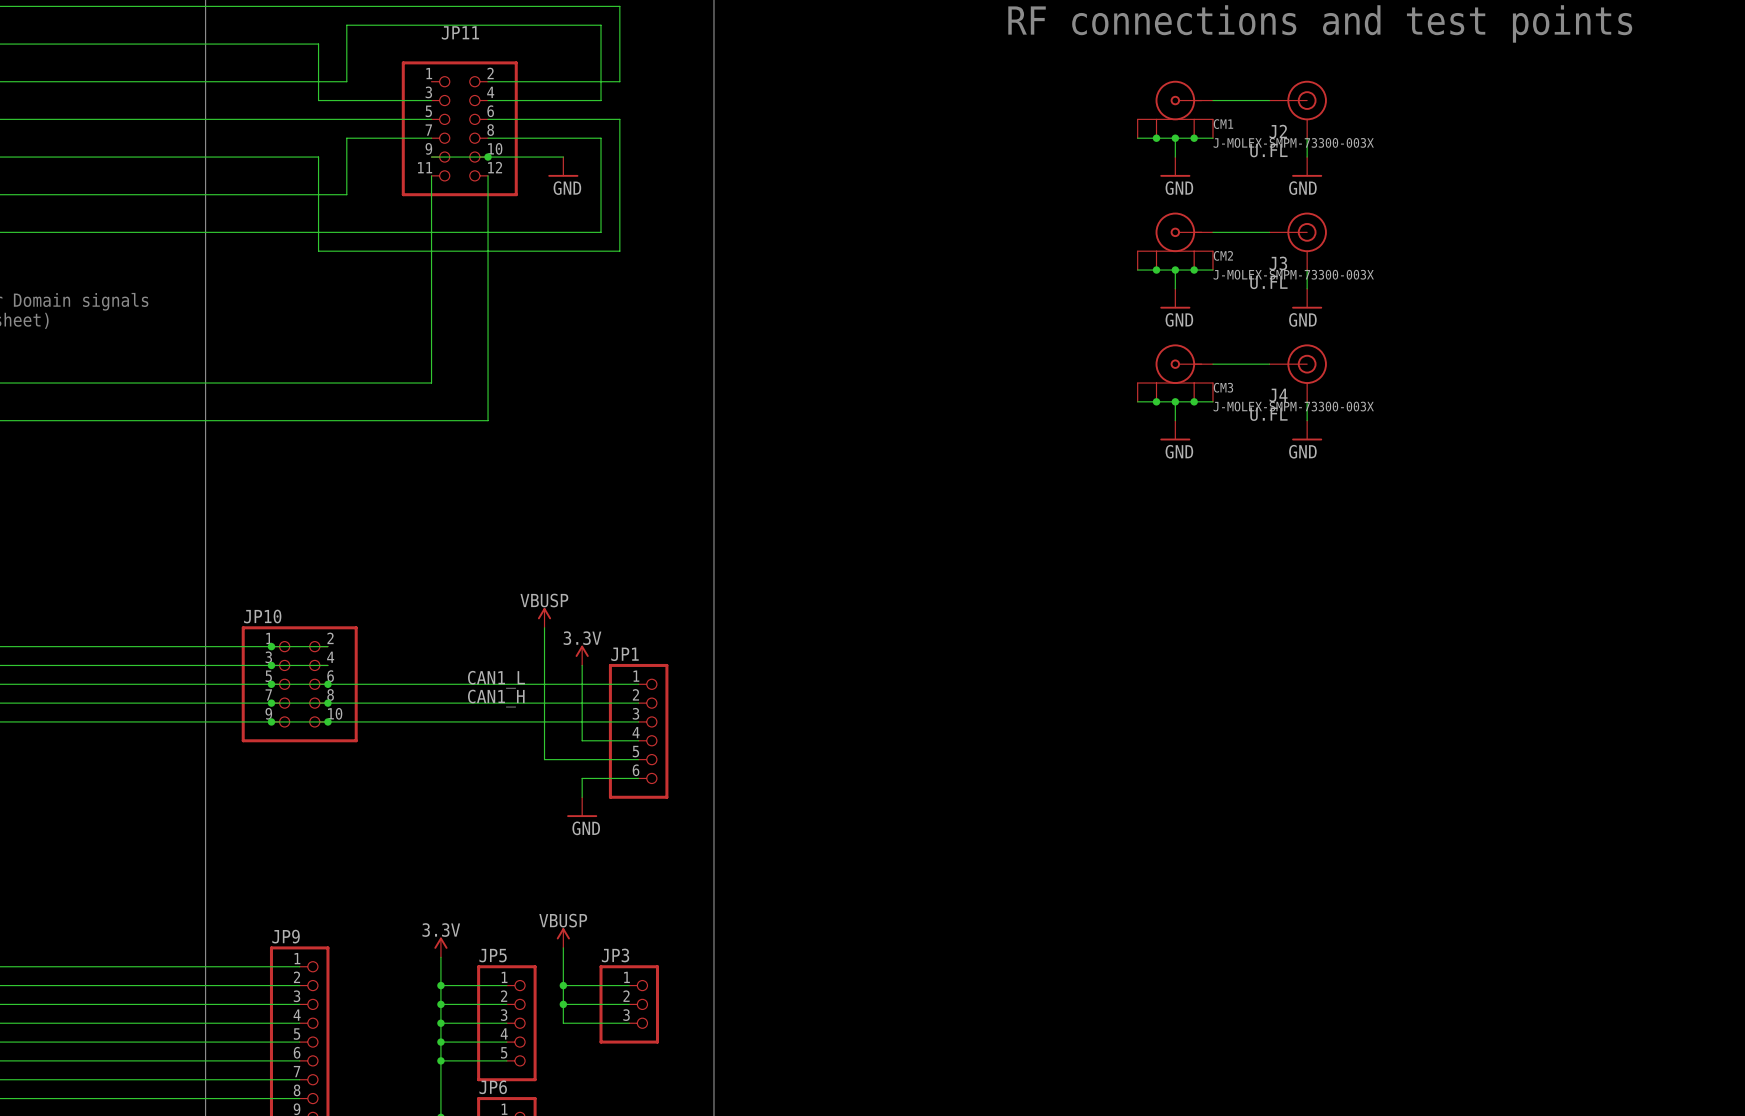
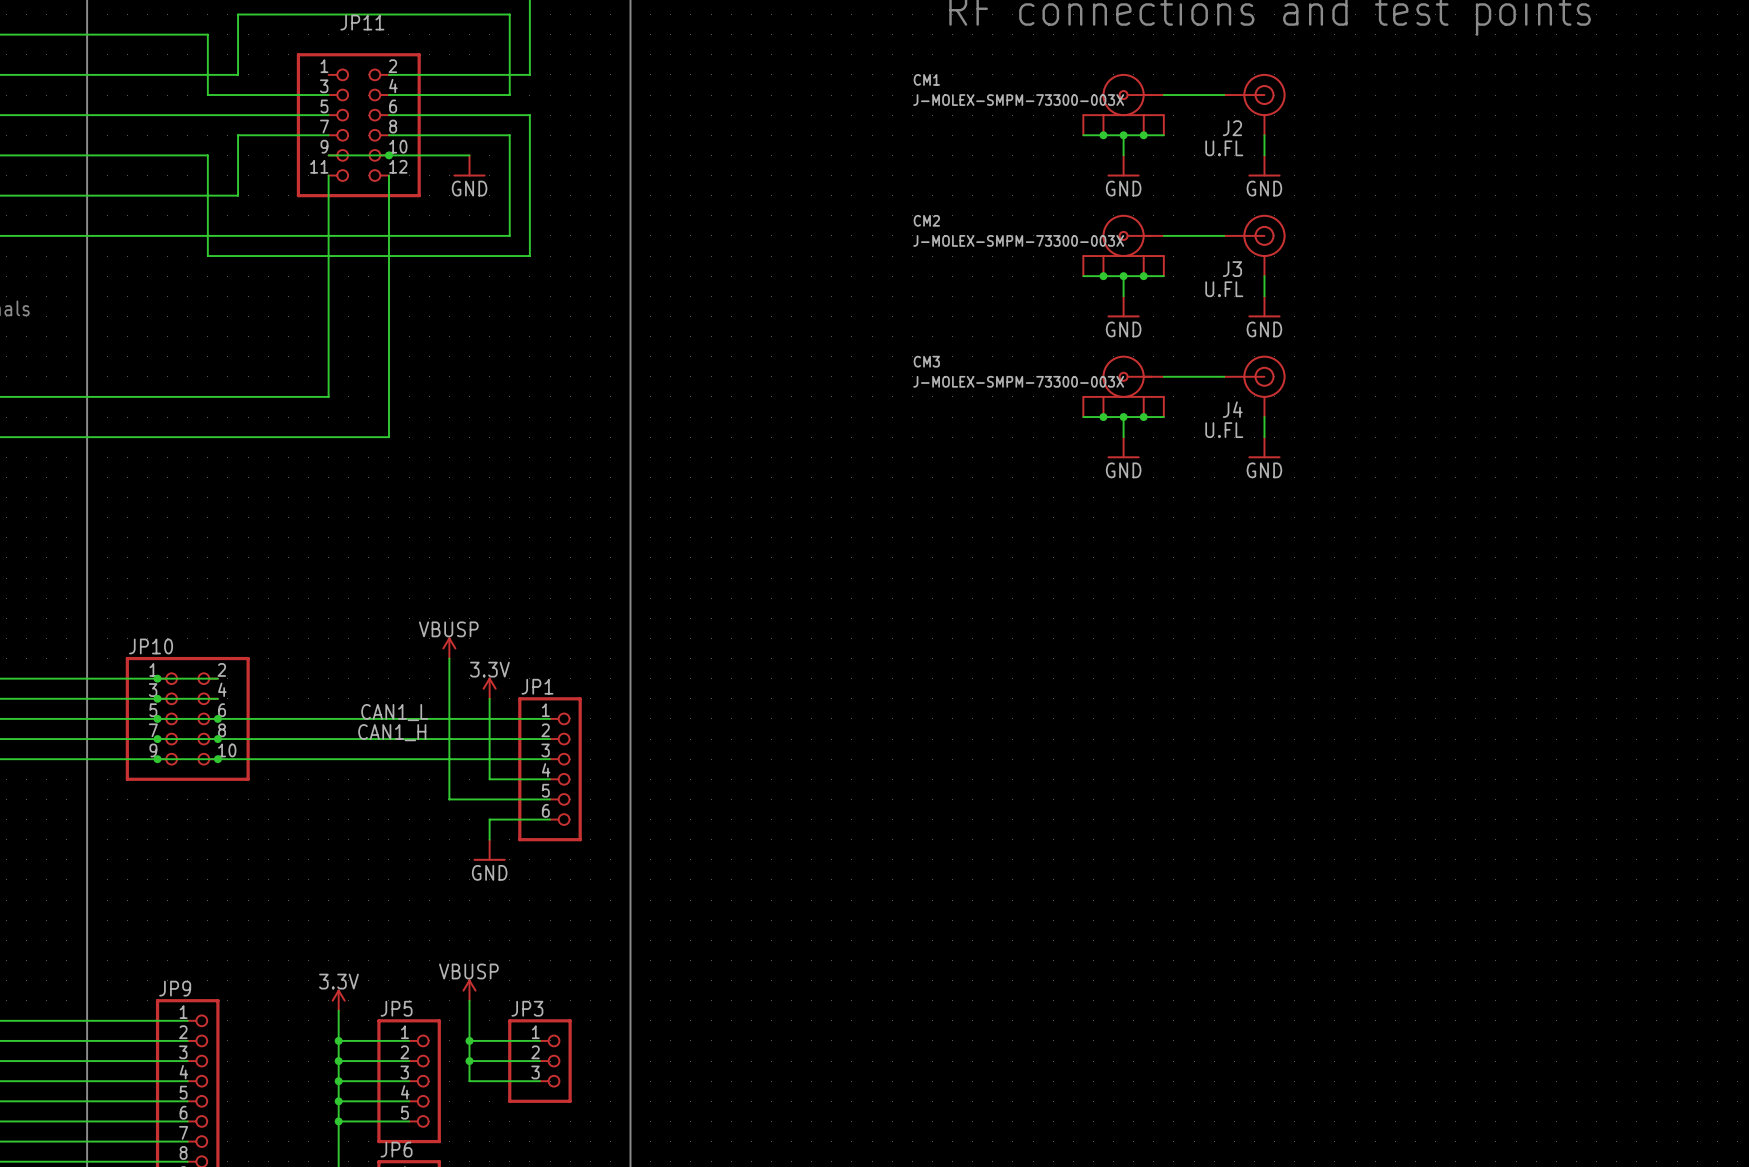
CM1 name position: CM1 (1223, 124) -> CM1 (926, 79)
CM1 value position: J-MOLEX-SMPM-73300-003X (1293, 142) -> J-MOLEX-SMPM-73300-003X (1018, 100)
CM2 name position: CM2 (1223, 255) -> CM2 (926, 220)
CM2 value position: J-MOLEX-SMPM-73300-003X (1293, 274) -> J-MOLEX-SMPM-73300-003X (1018, 240)
CM3 name position: CM3 (1223, 387) -> CM3 (926, 361)
CM3 value position: J-MOLEX-SMPM-73300-003X (1293, 406) -> J-MOLEX-SMPM-73300-003X (1018, 381)

